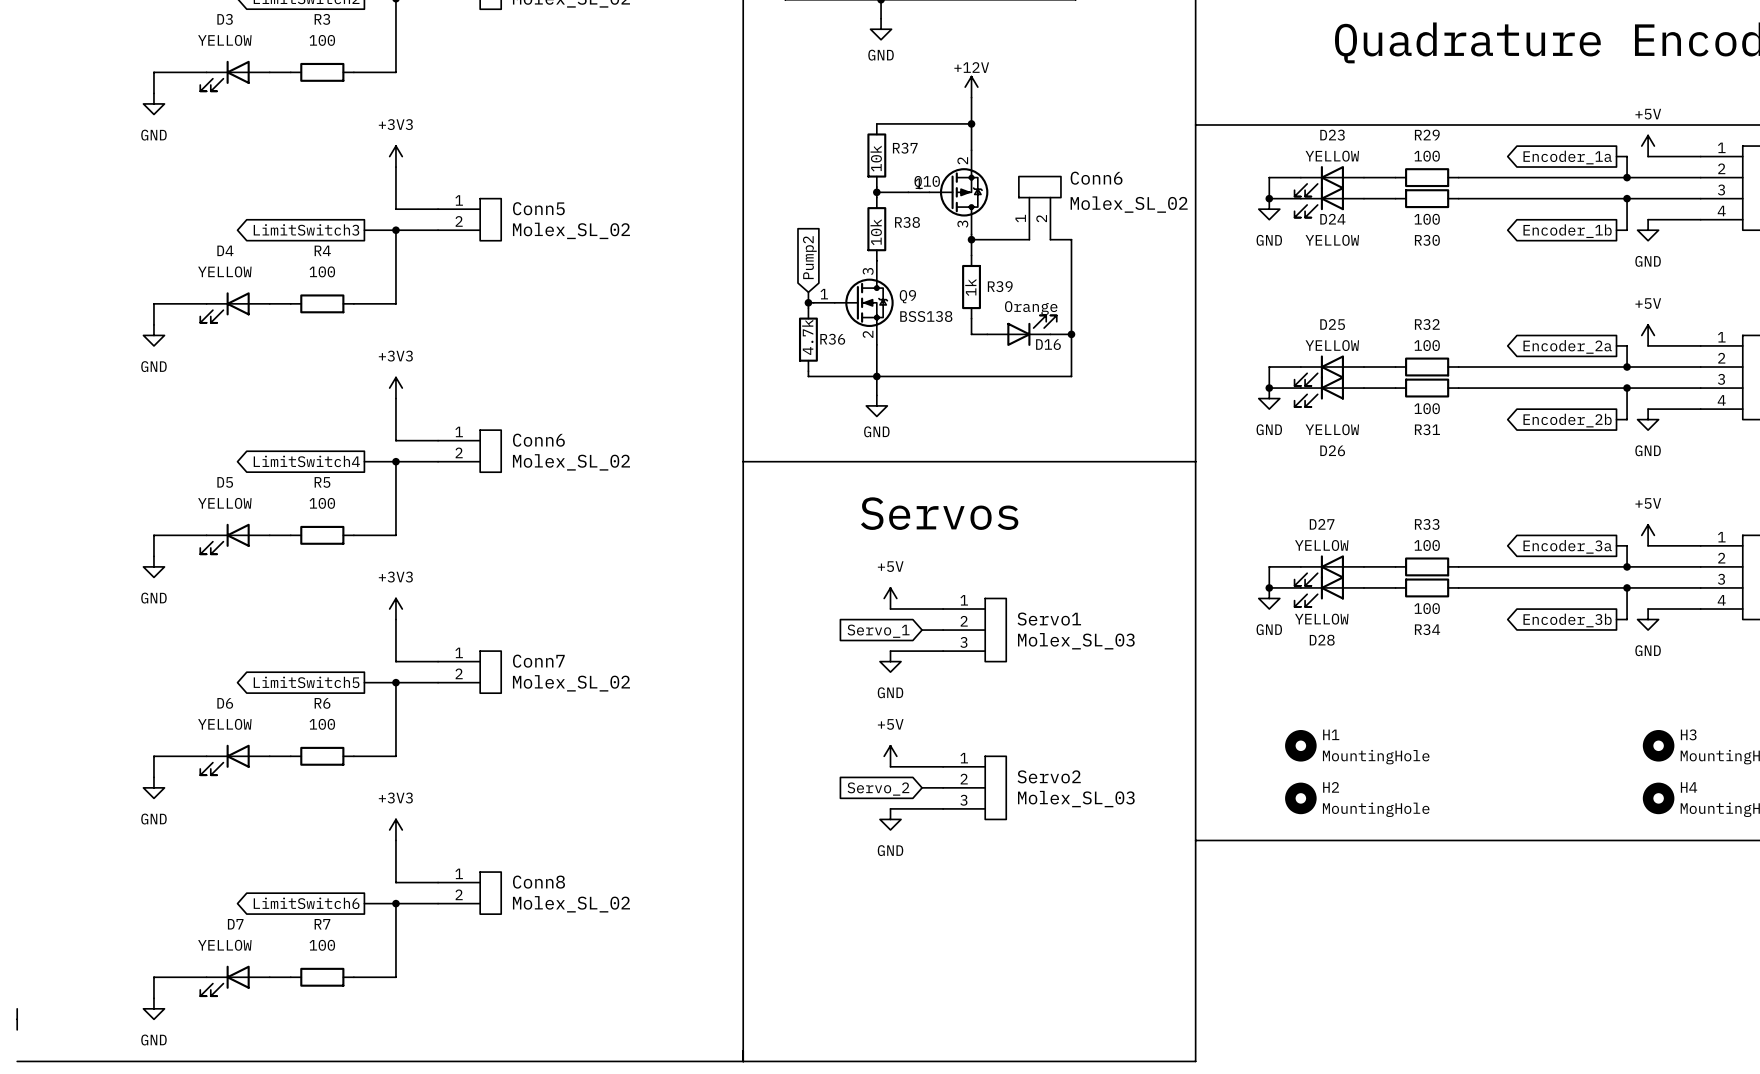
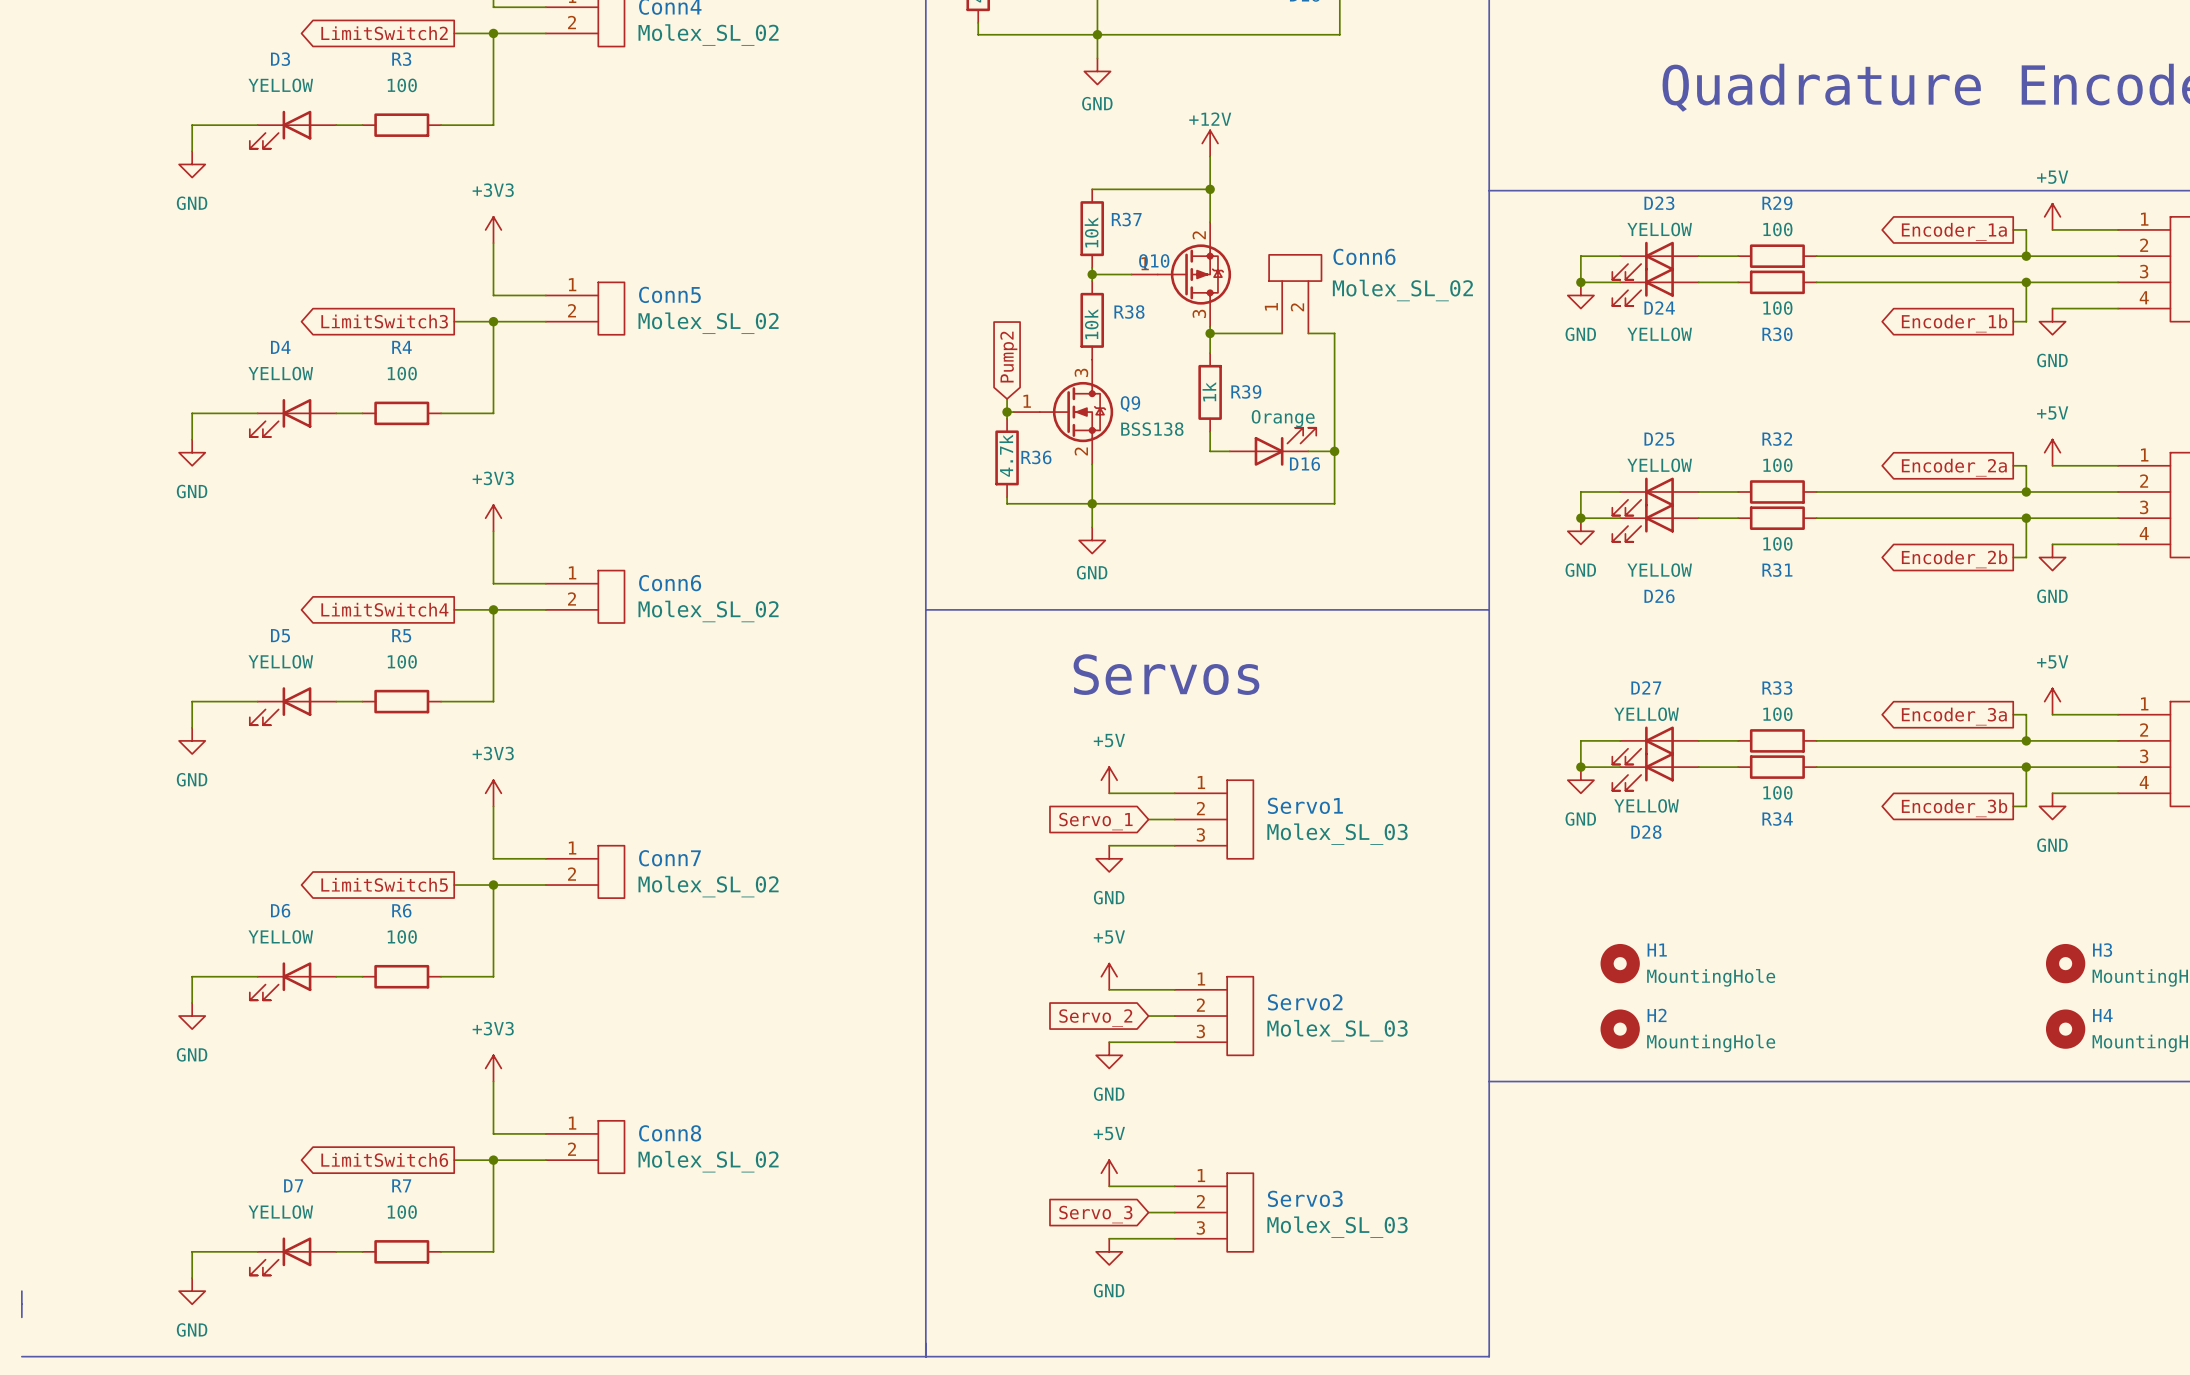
power symbol: none -> +5V (1109, 1173)
wire: none -> (1109, 1186) (1174, 1186)
wire: none -> (1148, 1212) (1174, 1212)
Servo3: none -> Molex_SL_03 (1214, 1212)
global label: none -> Servo_3 (1095, 1214)
wire: none -> (1109, 1238) (1174, 1238)
power symbol: none -> GND (1109, 1251)

